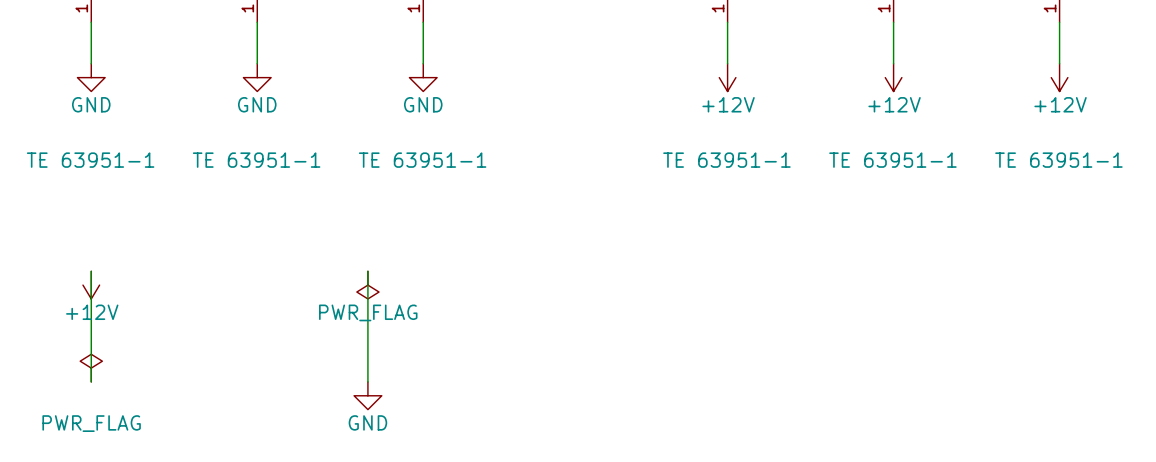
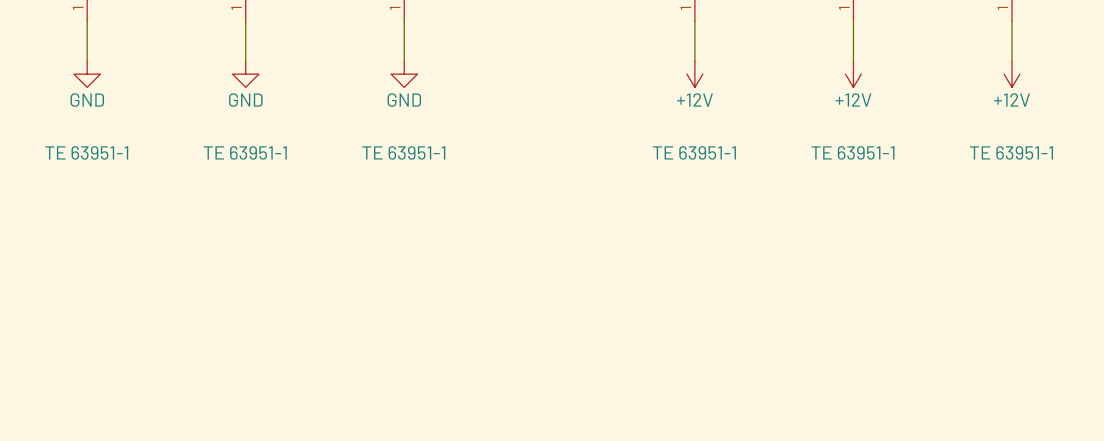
wire: (91, 271) (91, 381) -> none
wire: (367, 271) (367, 381) -> none
power symbol: +12V (91, 285) -> none
power symbol: PWR_FLAG (367, 285) -> none
power symbol: PWR_FLAG (91, 368) -> none
power symbol: GND (367, 395) -> none

